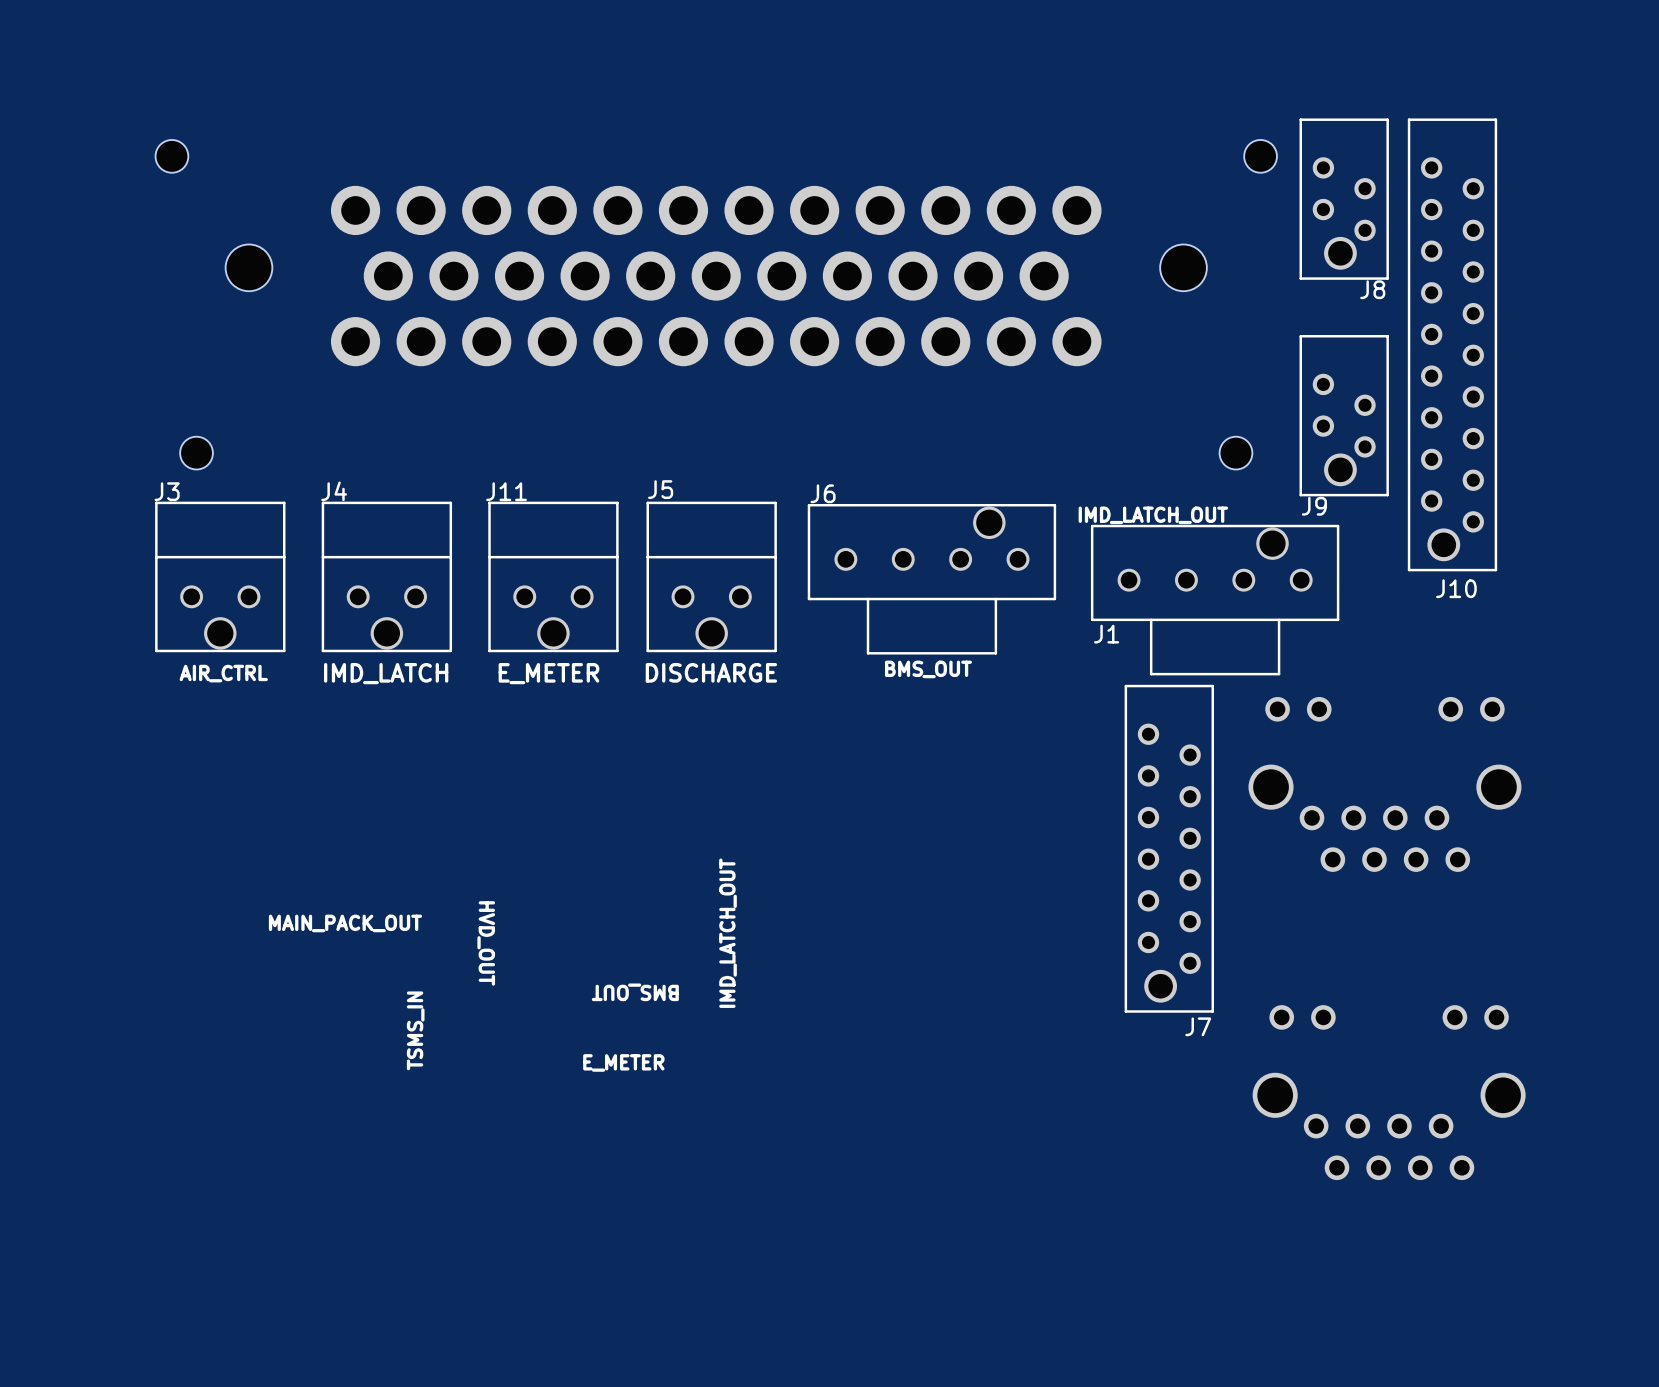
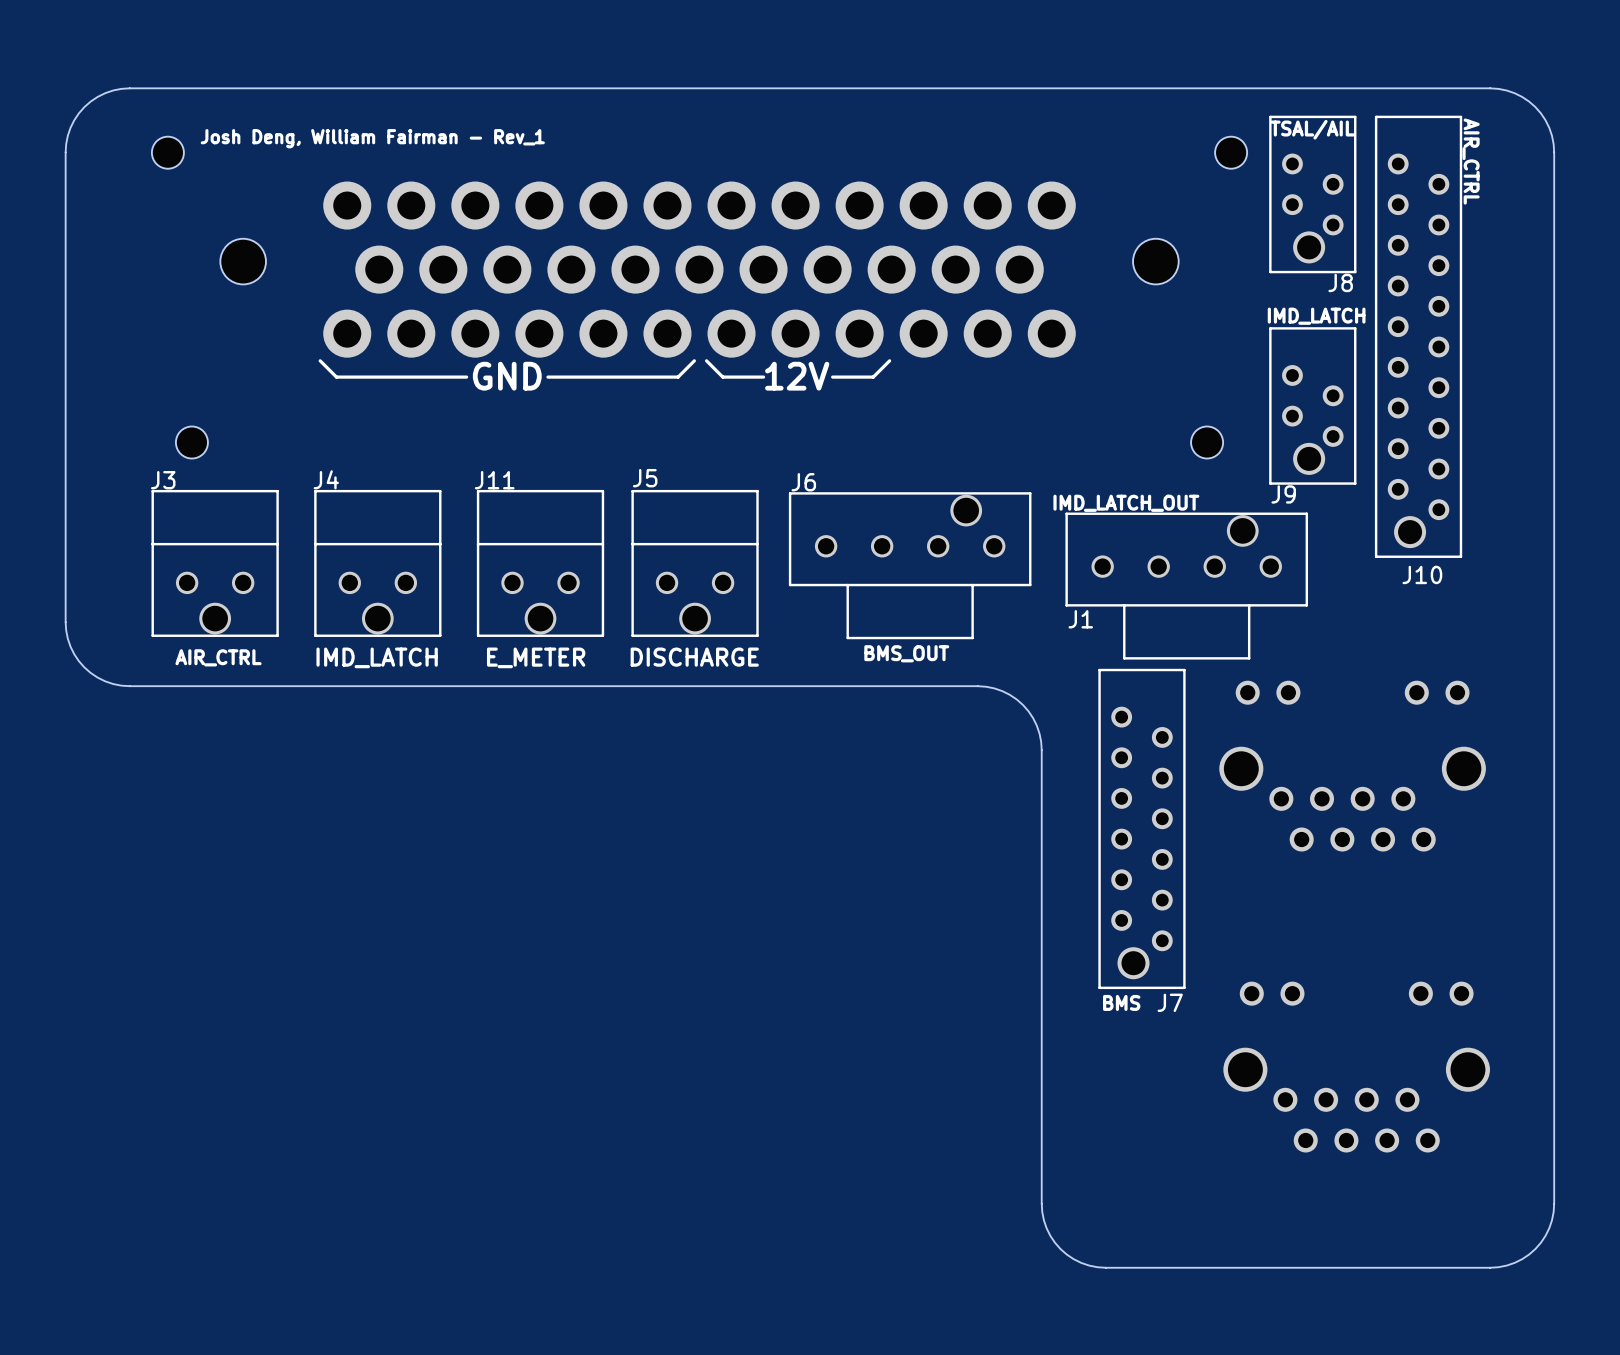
board edge: none -> (1490, 88) (129, 88) (105, 93) (90, 101) (78, 113) (70, 127) (65, 152) (65, 622) (70, 646) (78, 661) (90, 672) (105, 681) (129, 686) (977, 686) (1002, 691) (1016, 699) (1028, 711) (1036, 725) (1041, 741) (1041, 1203) (1046, 1228) (1060, 1249) (1081, 1262) (1105, 1267) (1490, 1267) (1514, 1262) (1529, 1254) (1540, 1242) (1549, 1228) (1554, 1203) (1554, 152) (1549, 127) (1535, 107) (1514, 93) (1490, 88)
text: none -> TSAL/AIL (1312, 129)
text: none -> Josh Deng, William Fairman - Rev_1 (372, 138)
text: none -> AIR_CTRL (1471, 161)
text: none -> IMD_LATCH (1316, 316)
line: none -> (320, 360) (336, 377) (466, 377)
line: none -> (694, 360) (678, 377) (547, 377)
line: none -> (706, 360) (722, 377) (763, 377)
line: none -> (889, 360) (873, 377) (832, 377)
text: none -> GND (507, 376)
text: none -> 12V (797, 376)
text: MAIN_PACK_OUT (345, 923) -> none
text: IMD_LATCH_OUT (728, 933) -> none
text: HVD_OUT (486, 943) -> none
text: BMS_OUT (635, 992) -> none
text: none -> BMS (1121, 1002)
text: TSMS_IN (415, 1030) -> none
text: E_METER (623, 1062) -> none

